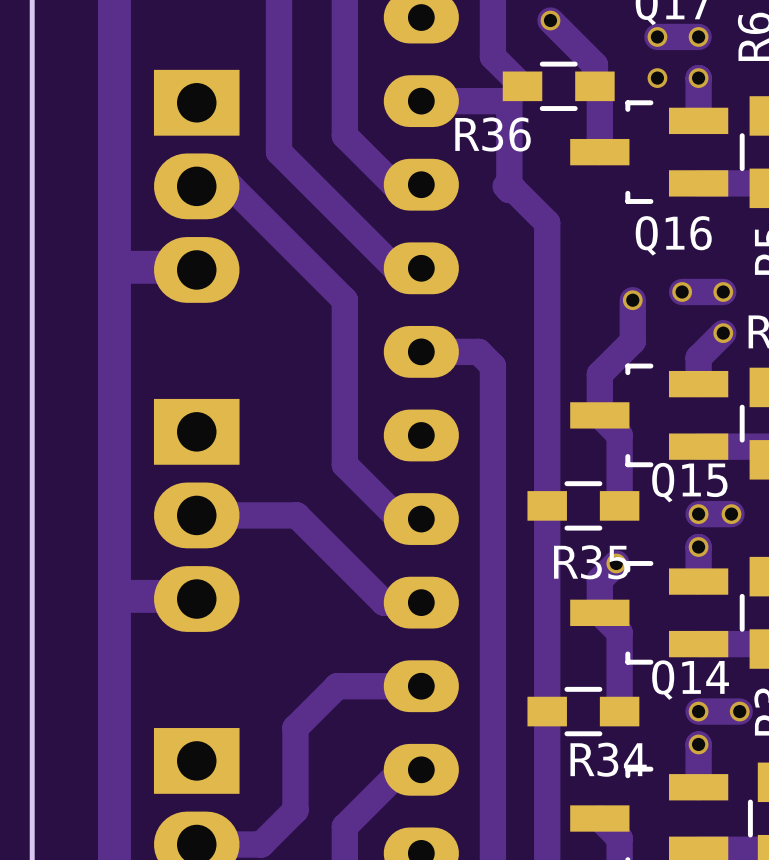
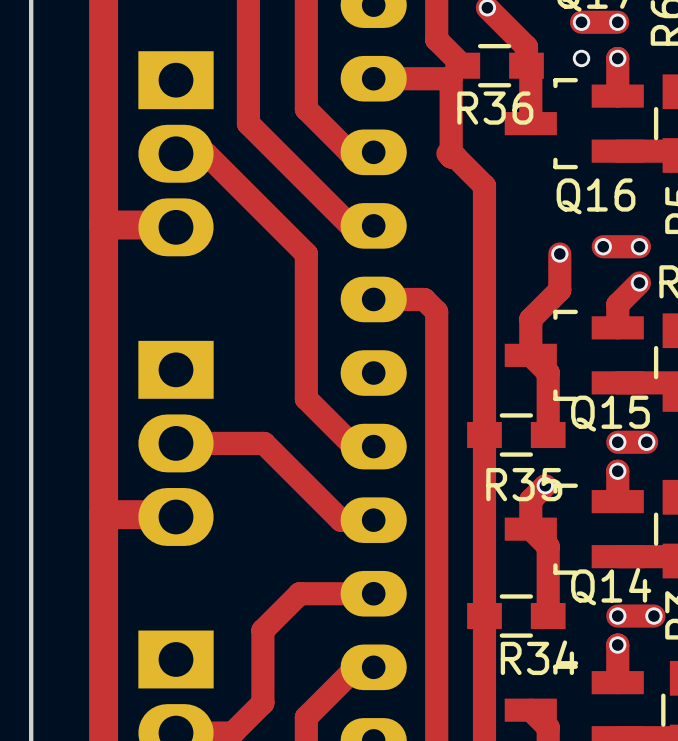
R36 name position: R36 (493, 134) -> R36 (495, 108)

